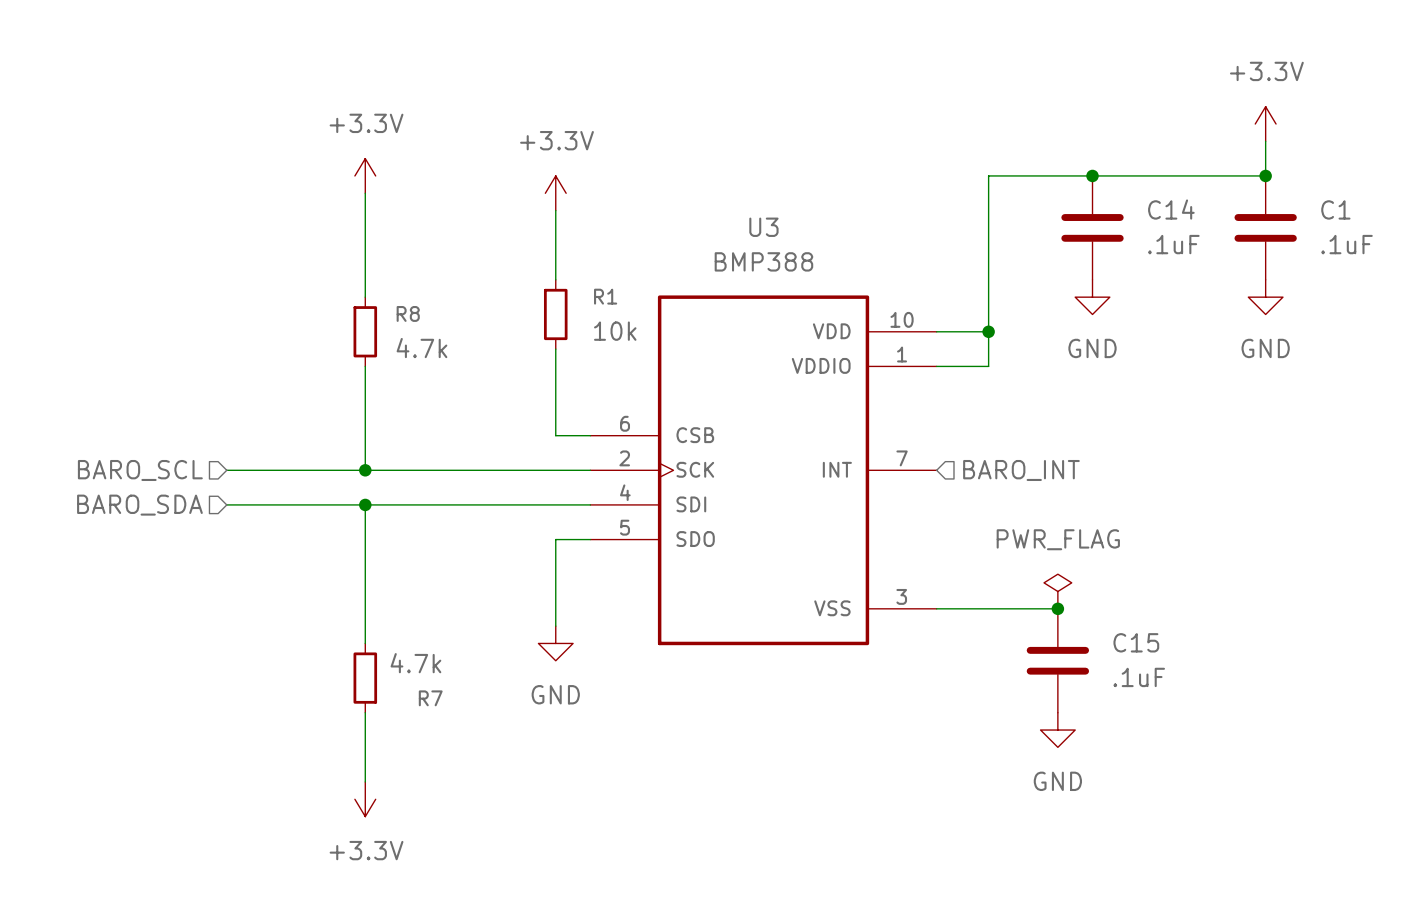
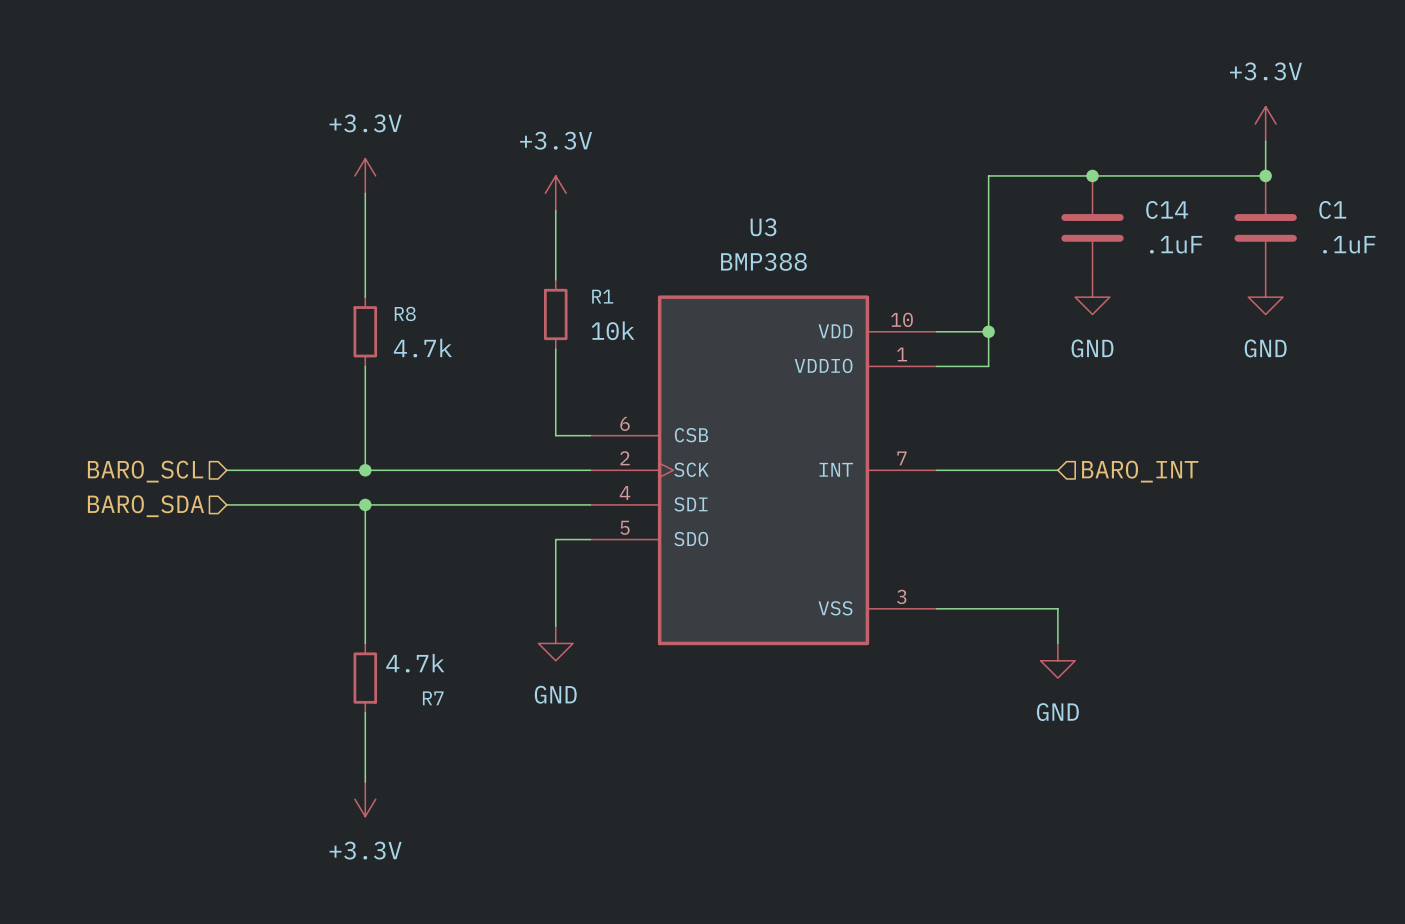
wire: none -> (936, 470) (1057, 470)
hierarchical label position: BARO_INT (1021, 470) -> BARO_INT (1140, 471)
power symbol: PWR_FLAG (1057, 591) -> none
junction: (1057, 608) -> none
C15: .1uF (1057, 660) -> none
power symbol position: GND (1057, 730) -> GND (1057, 660)

